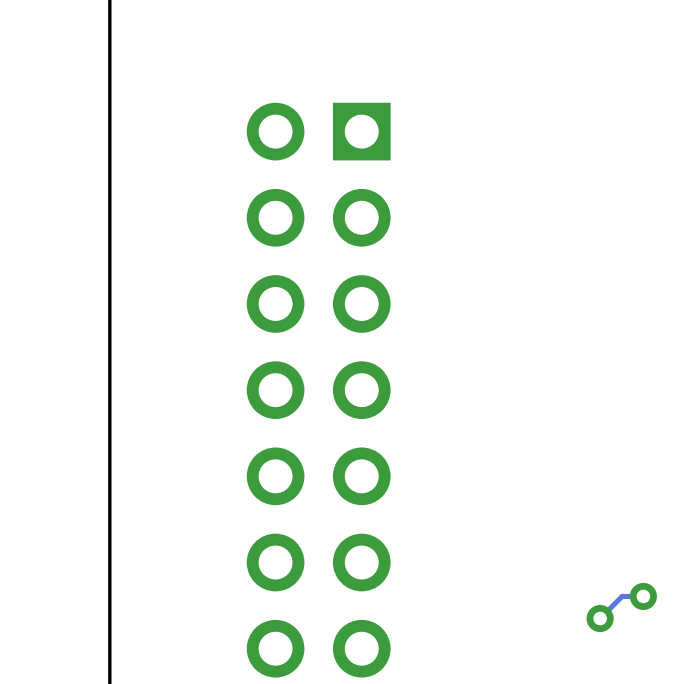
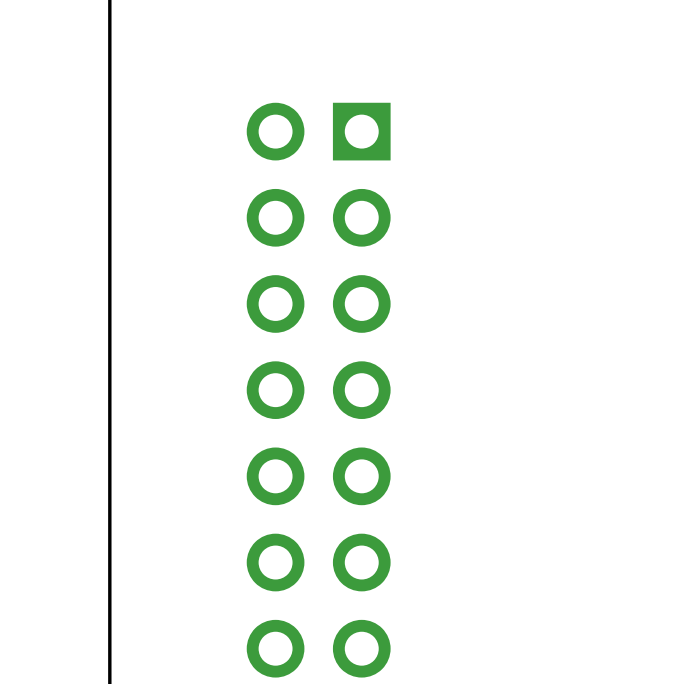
track: (643, 596) (622, 596) (600, 618) -> none
via: (643, 596) -> none
via: (600, 618) -> none

